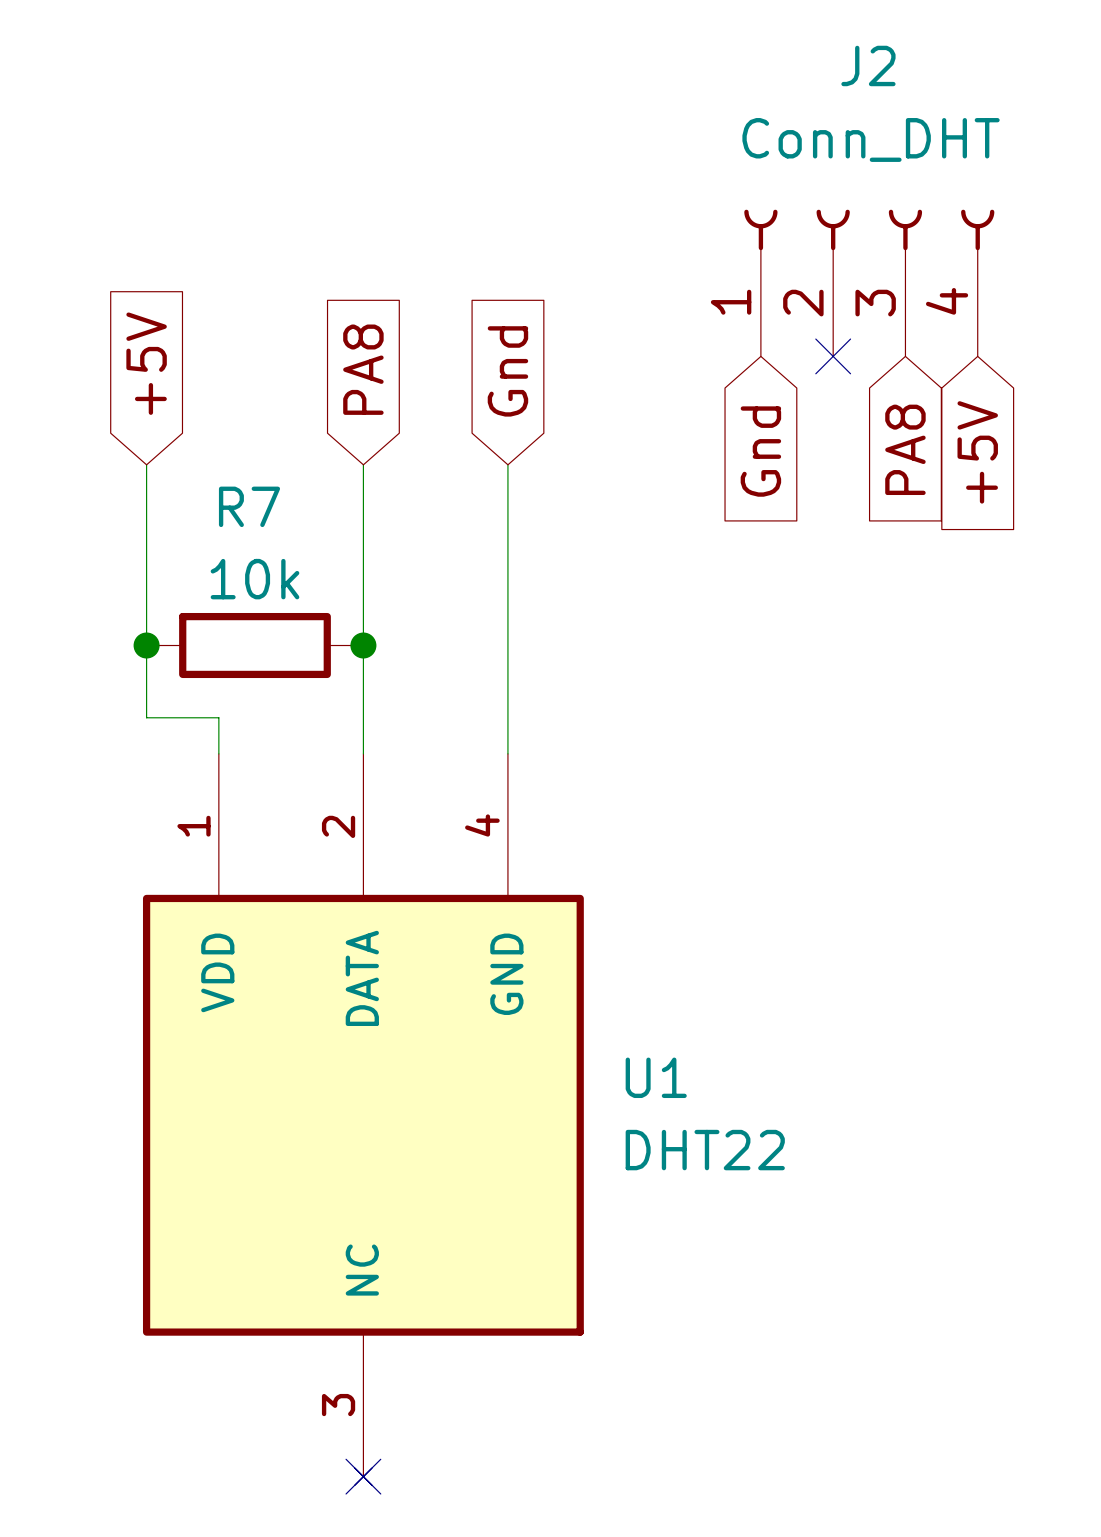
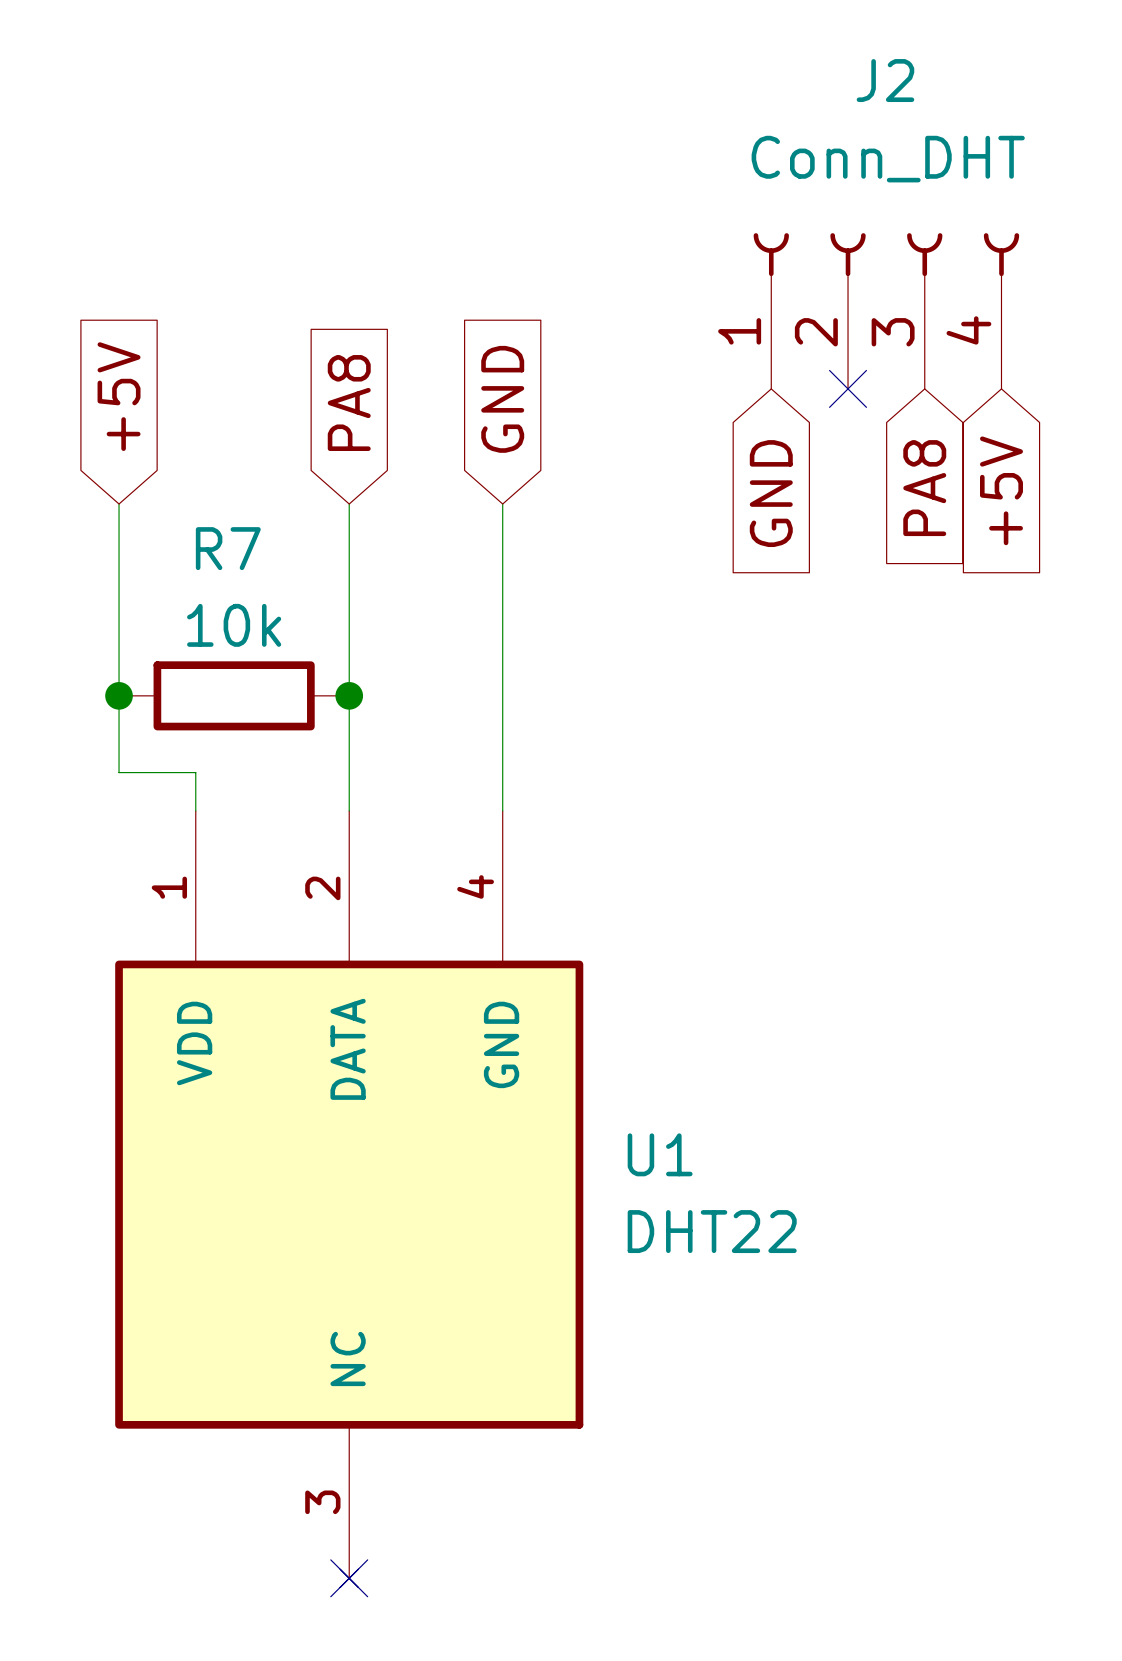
global label: Gnd (507, 371) -> GND (502, 399)
global label: Gnd (760, 451) -> GND (771, 493)

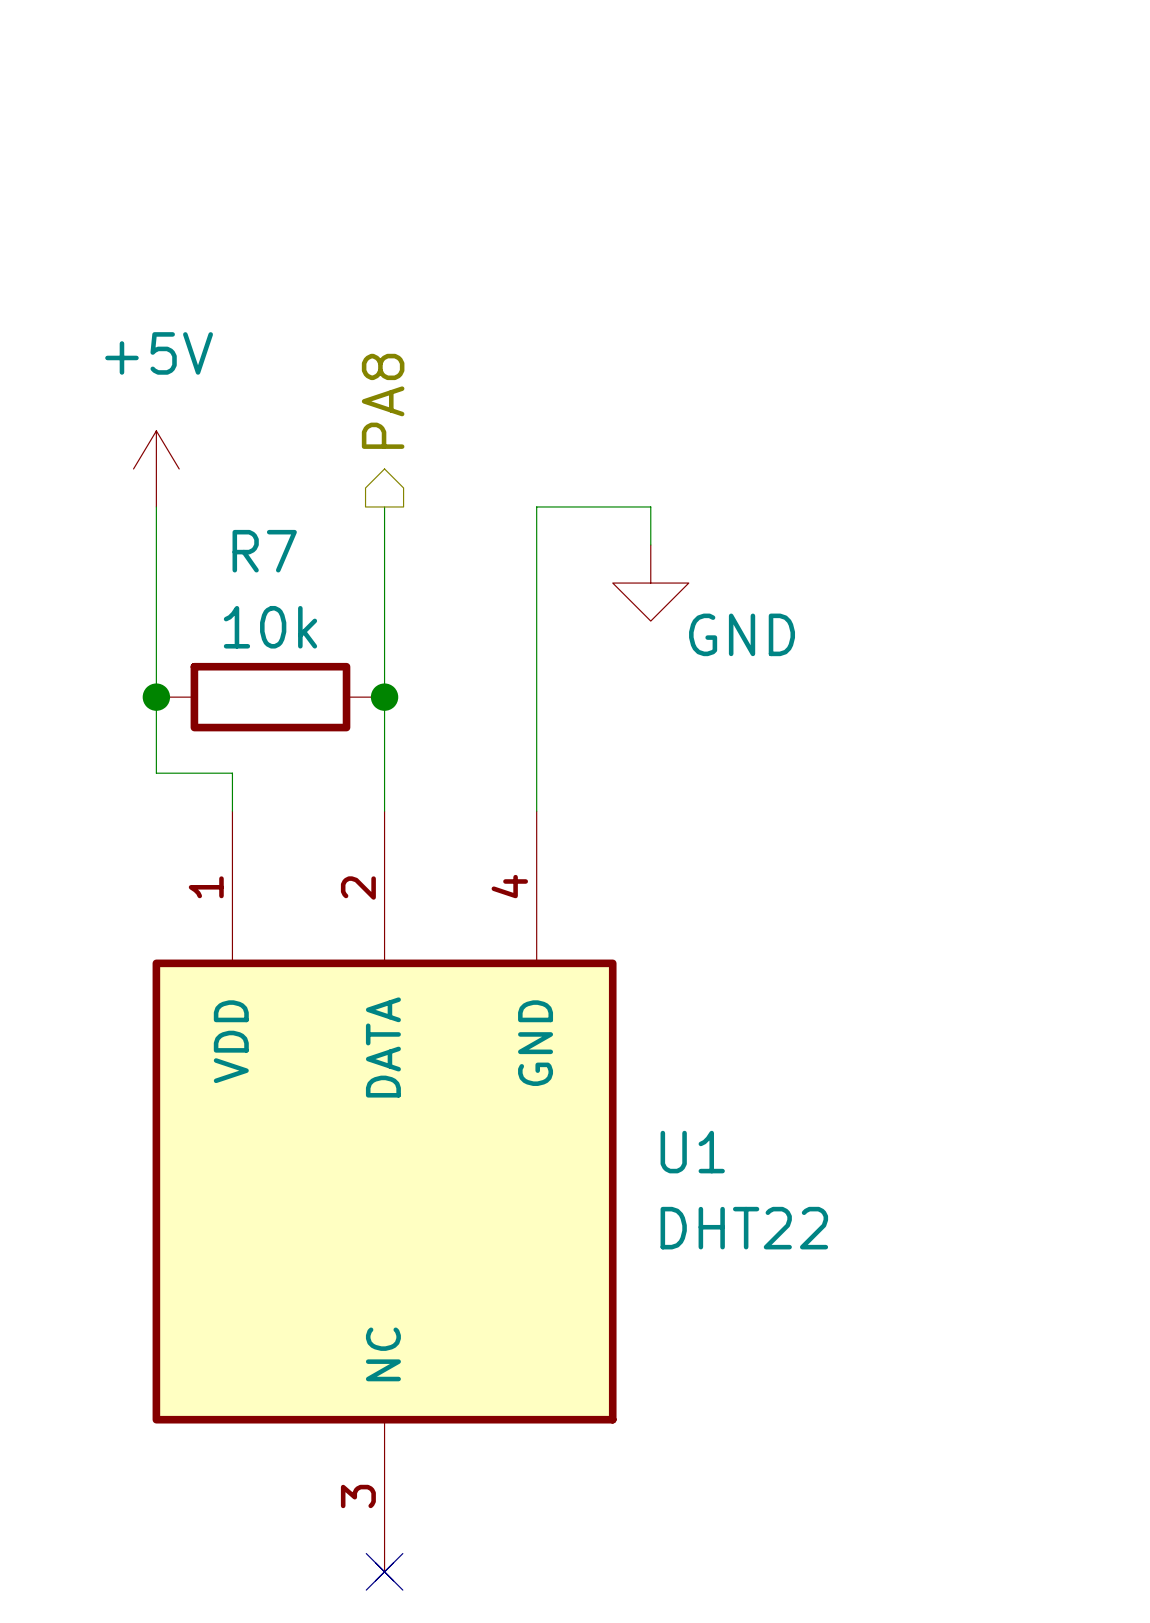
J2: Conn_DHT (886, 311) -> none
no-connect mark: (848, 388) -> none
global label: +5V (119, 396) -> none
hierarchical label: none -> PA8 (383, 401)
global label: GND (502, 399) -> none
global label: PA8 (349, 403) -> none
power symbol: none -> +5V (156, 468)
global label: PA8 (924, 488) -> none
global label: +5V (1001, 490) -> none
global label: GND (771, 493) -> none
wire: none -> (536, 506) (650, 506) (650, 545)
power symbol: none -> GND (650, 583)

